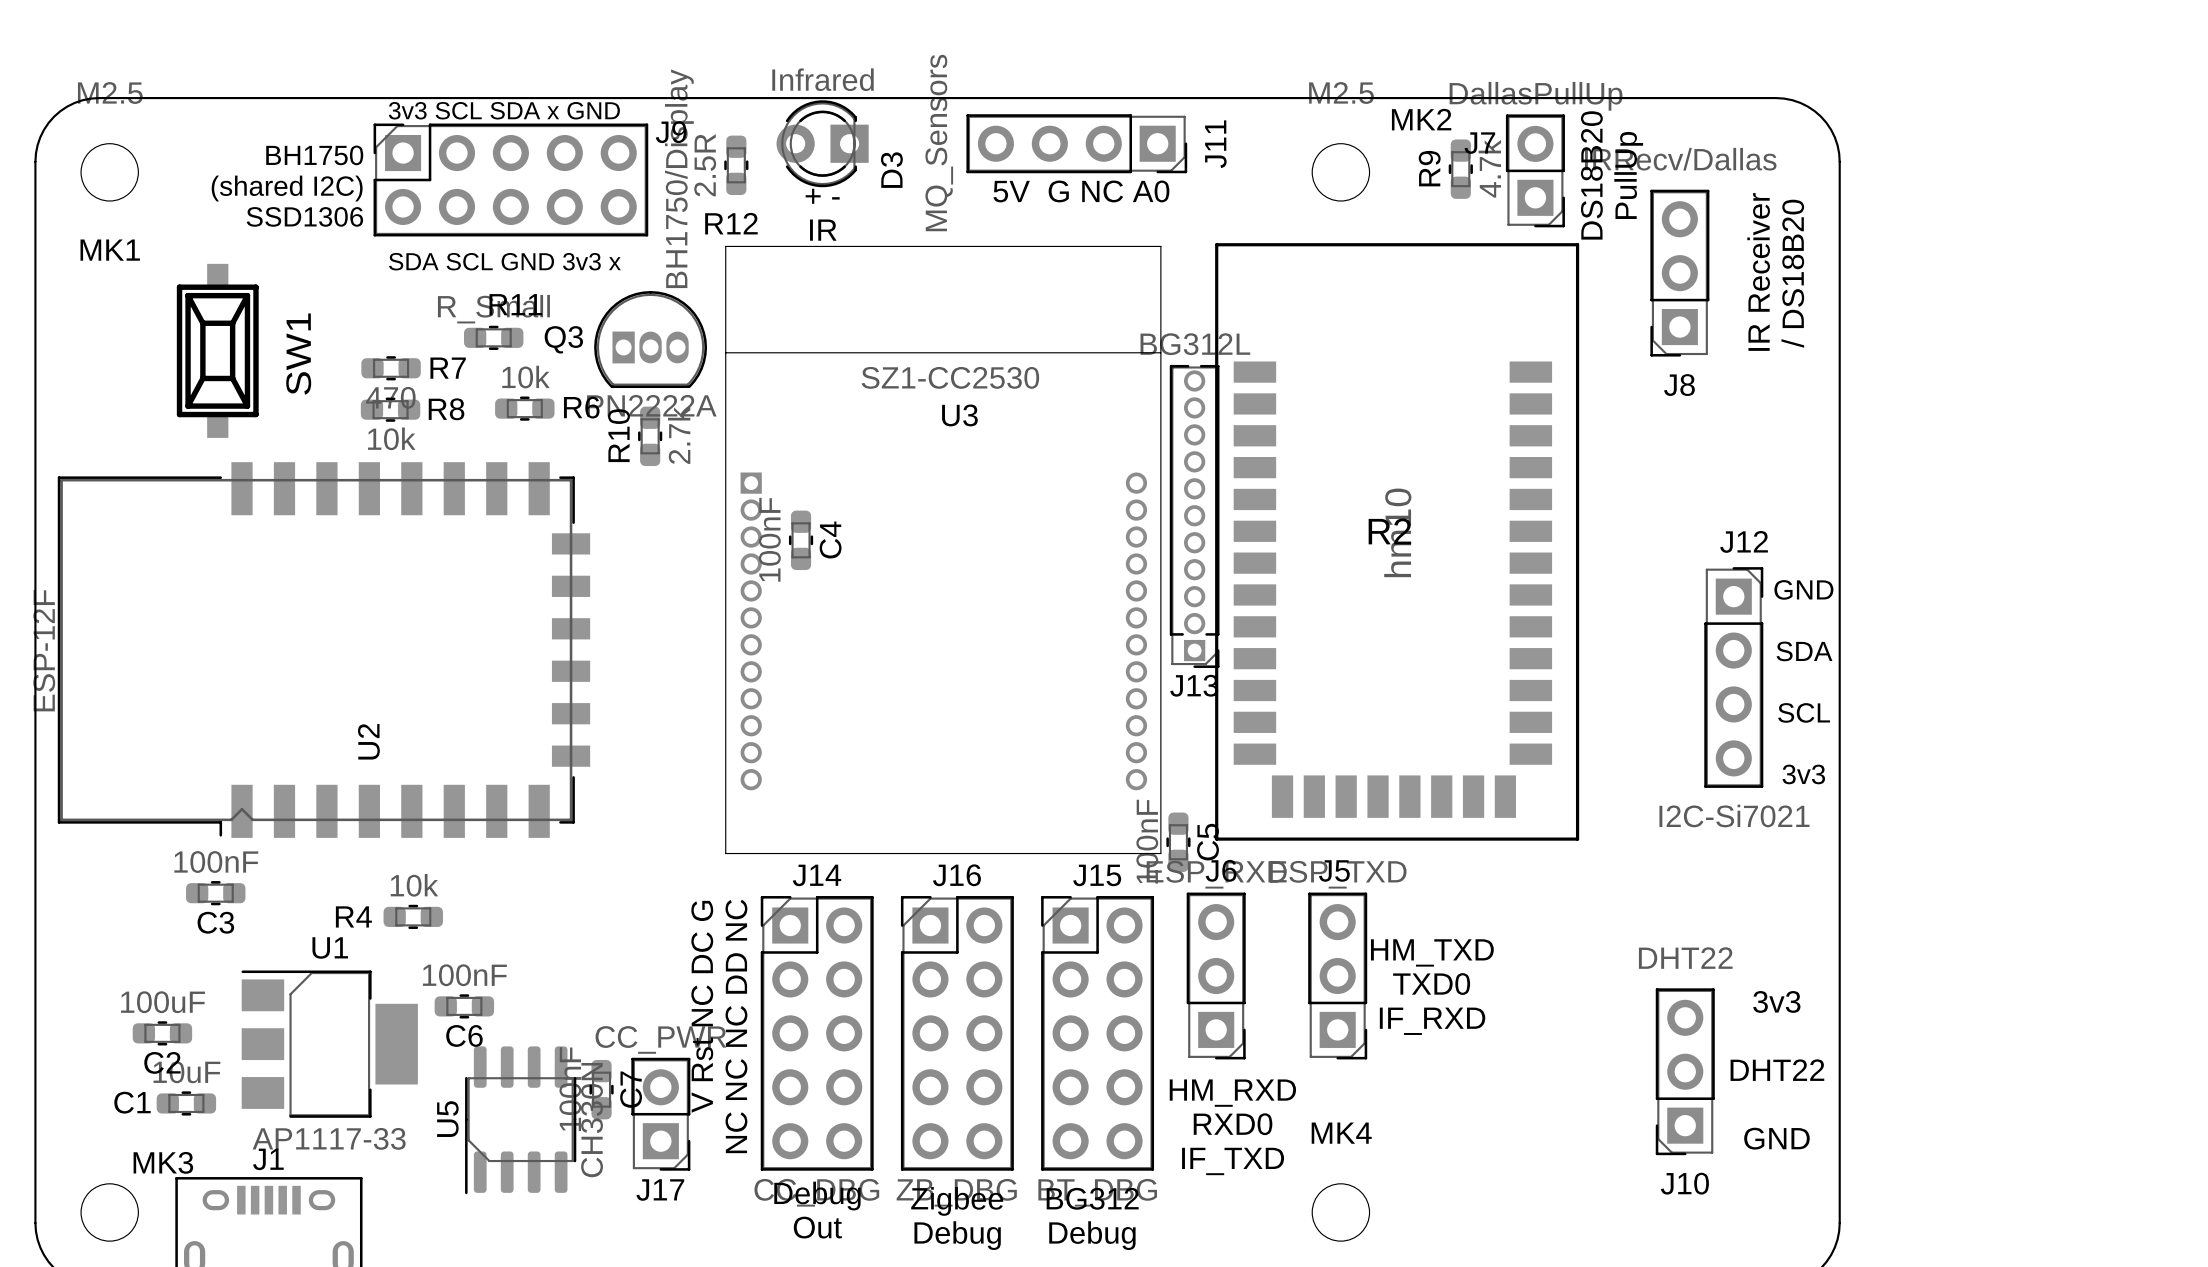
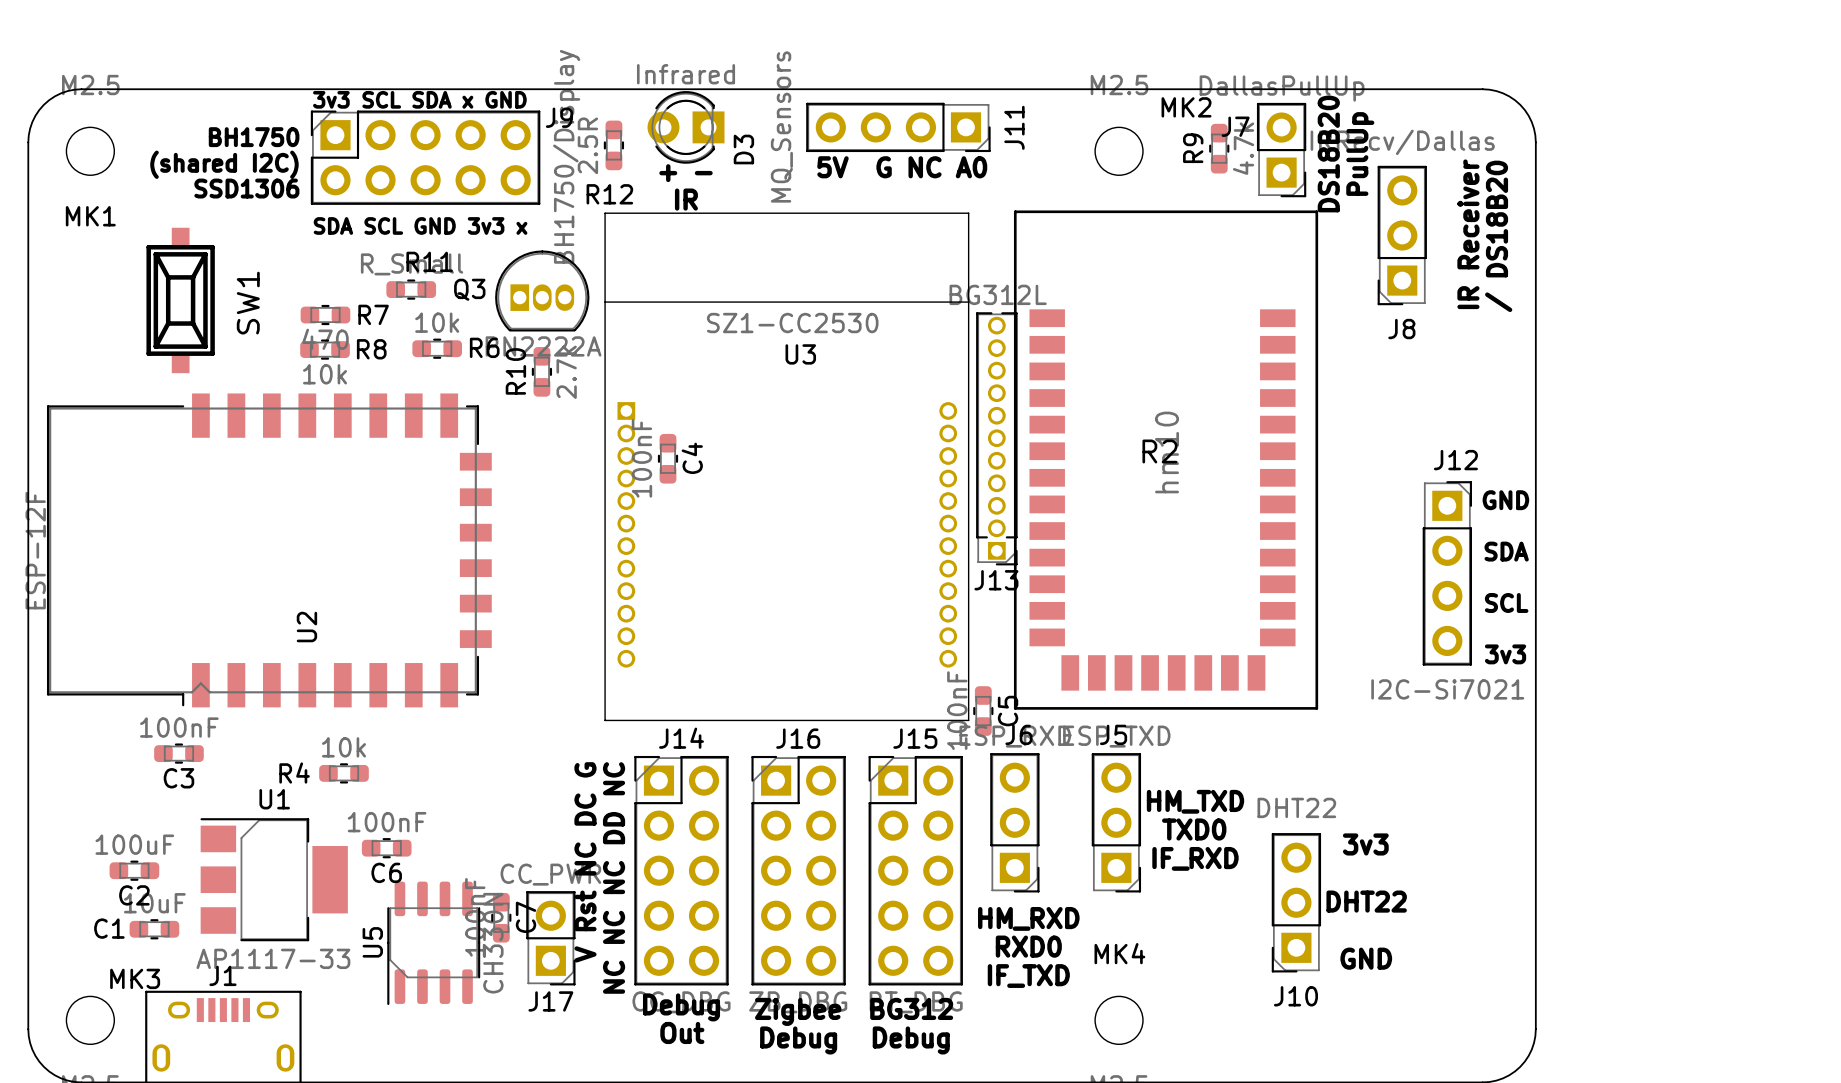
text position: 3v3 (1776, 1001) -> 3v3 (1365, 844)
text position: DHT22 (1777, 1070) -> DHT22 (1366, 901)
J10 position: (1685, 1071) -> (1296, 902)
text position: GND (1776, 1138) -> GND (1366, 958)

